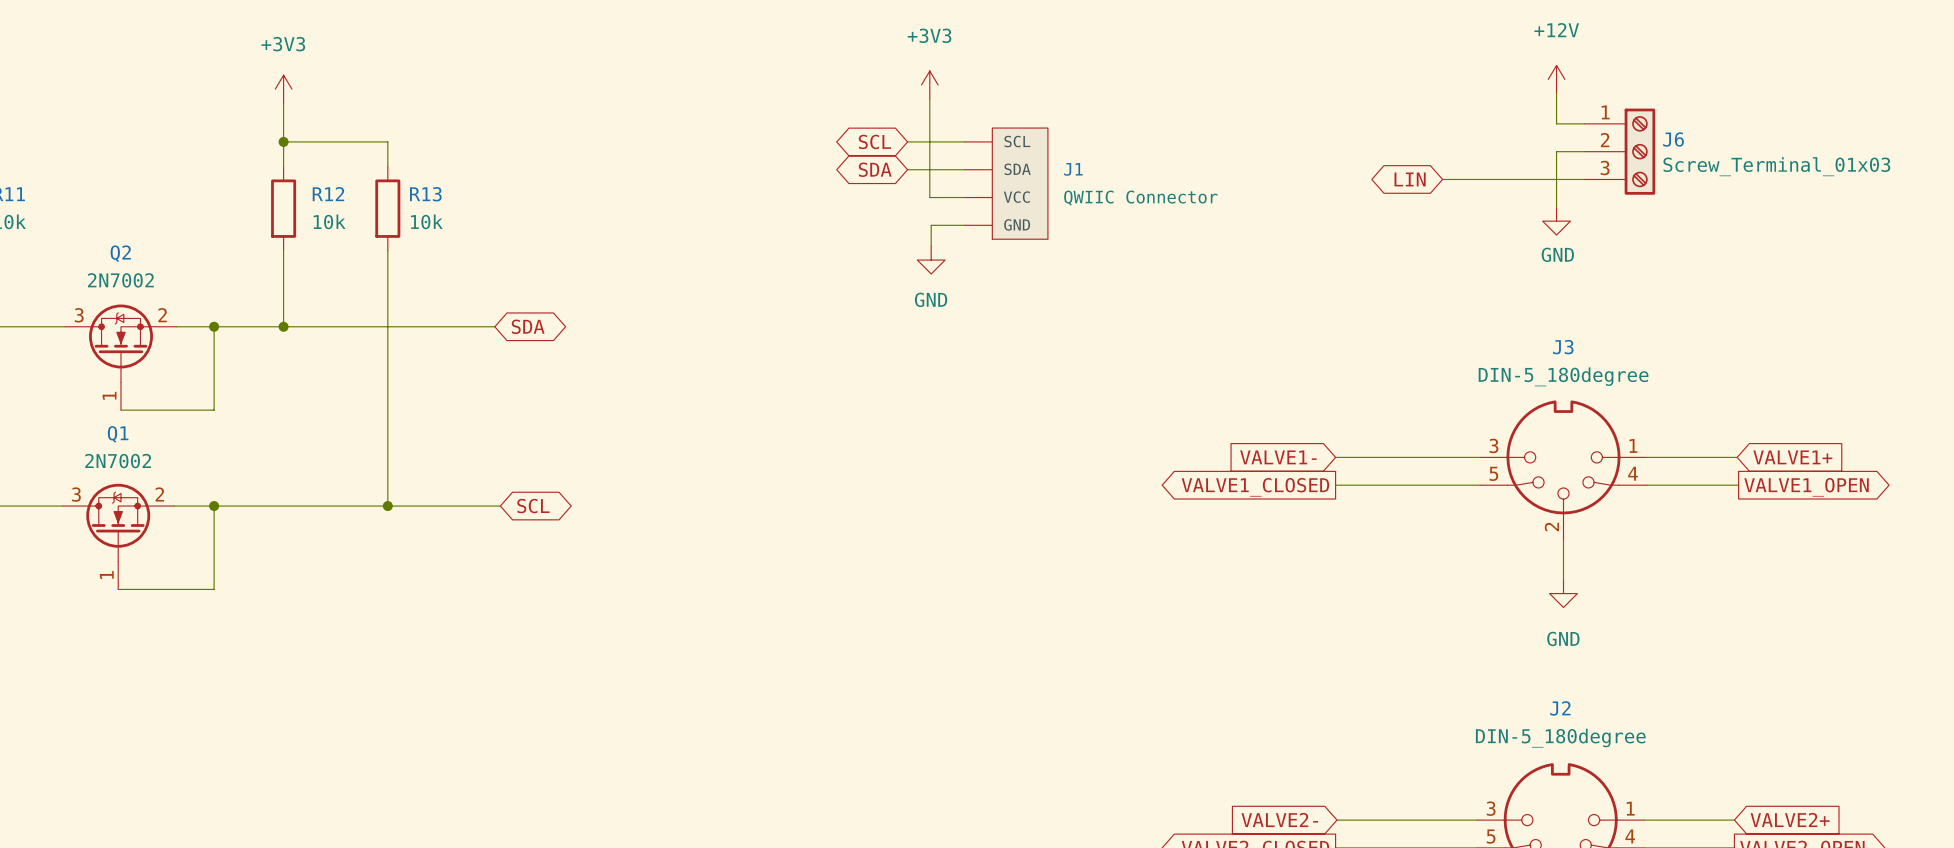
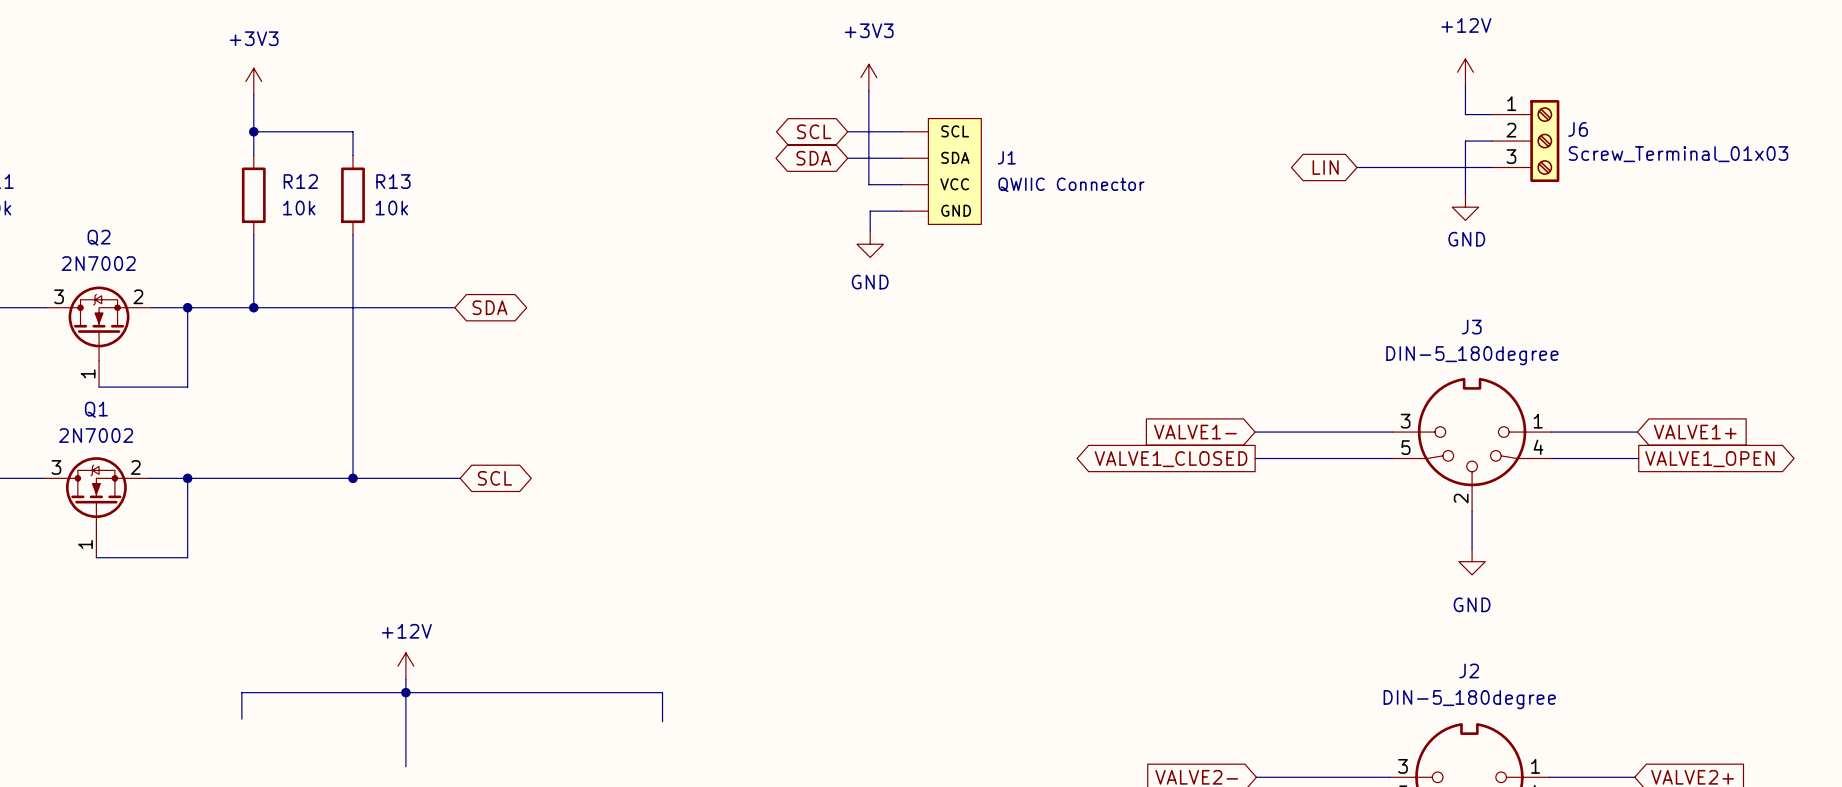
power symbol: none -> +12V (405, 666)
wire: none -> (405, 679) (405, 766)
junction: none -> (405, 692)
wire: none -> (241, 719) (241, 692) (662, 692) (662, 721)

